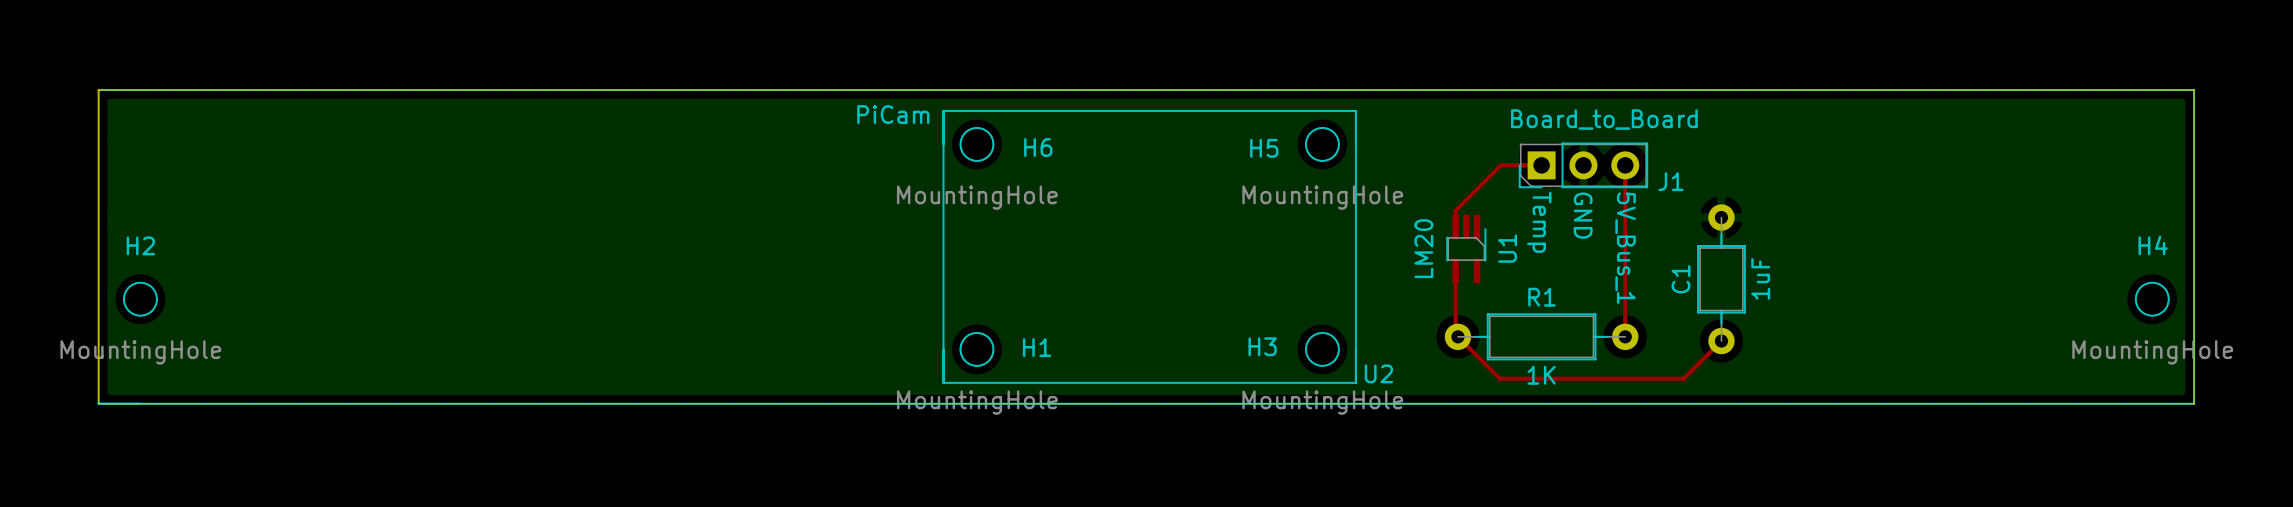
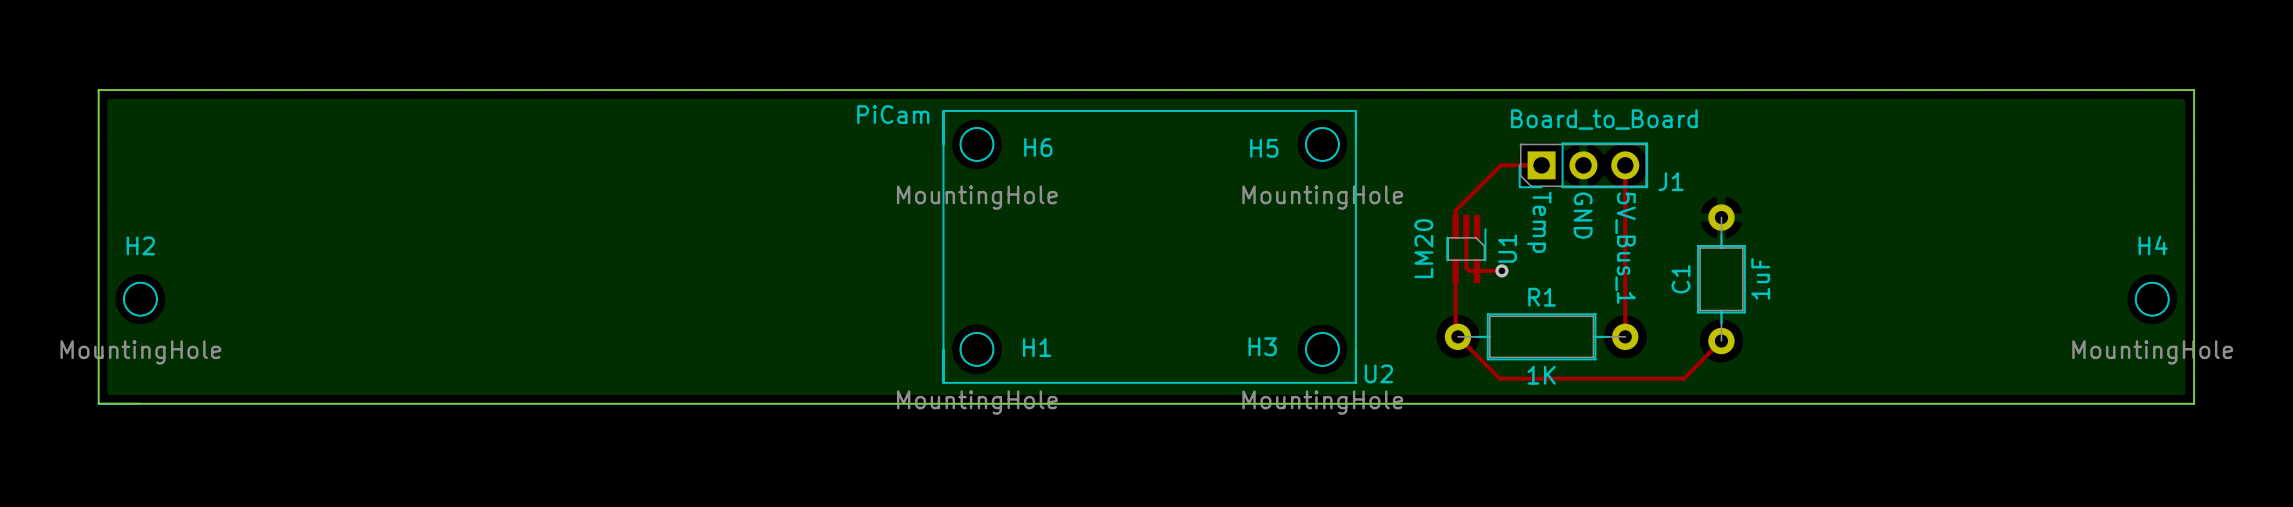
top track: none -> (1466, 227) (1466, 267) (1469, 270) (1501, 270)
via: none -> (1501, 270)

